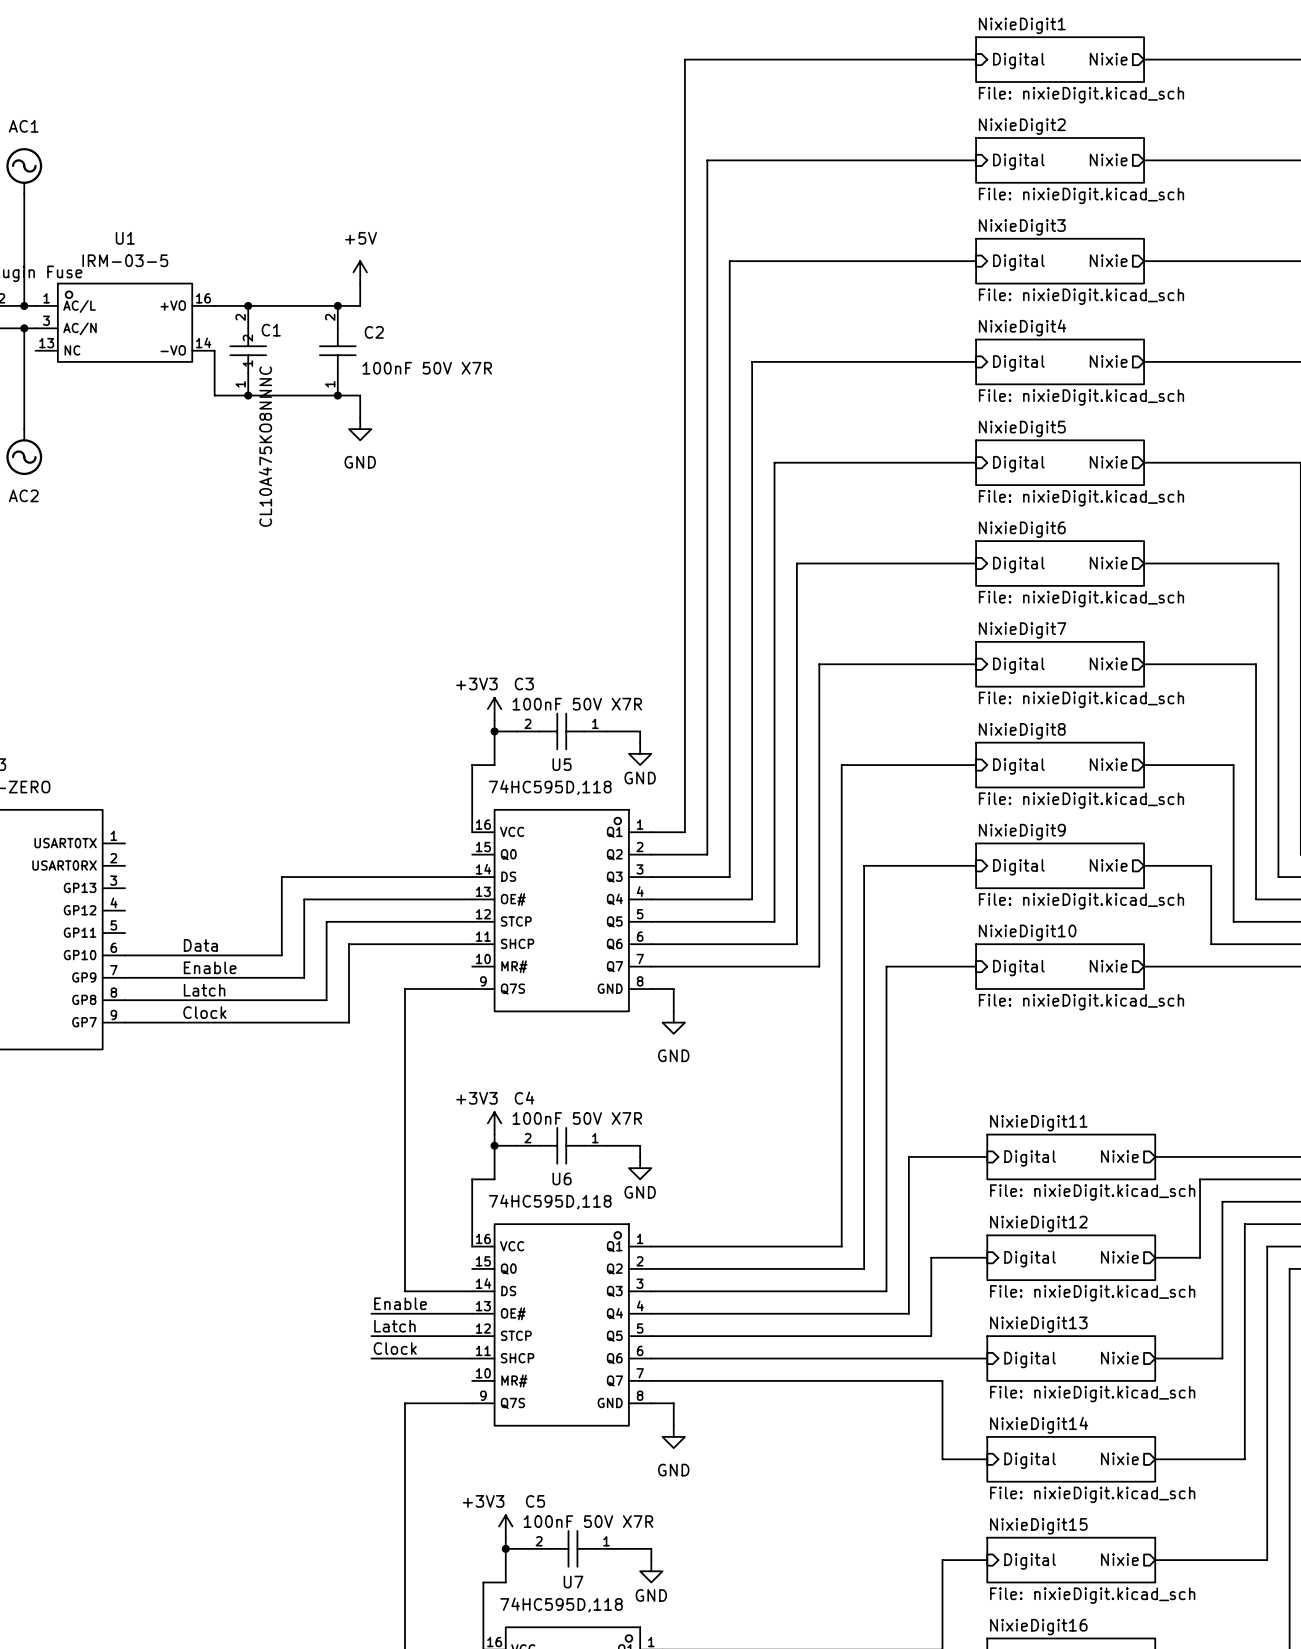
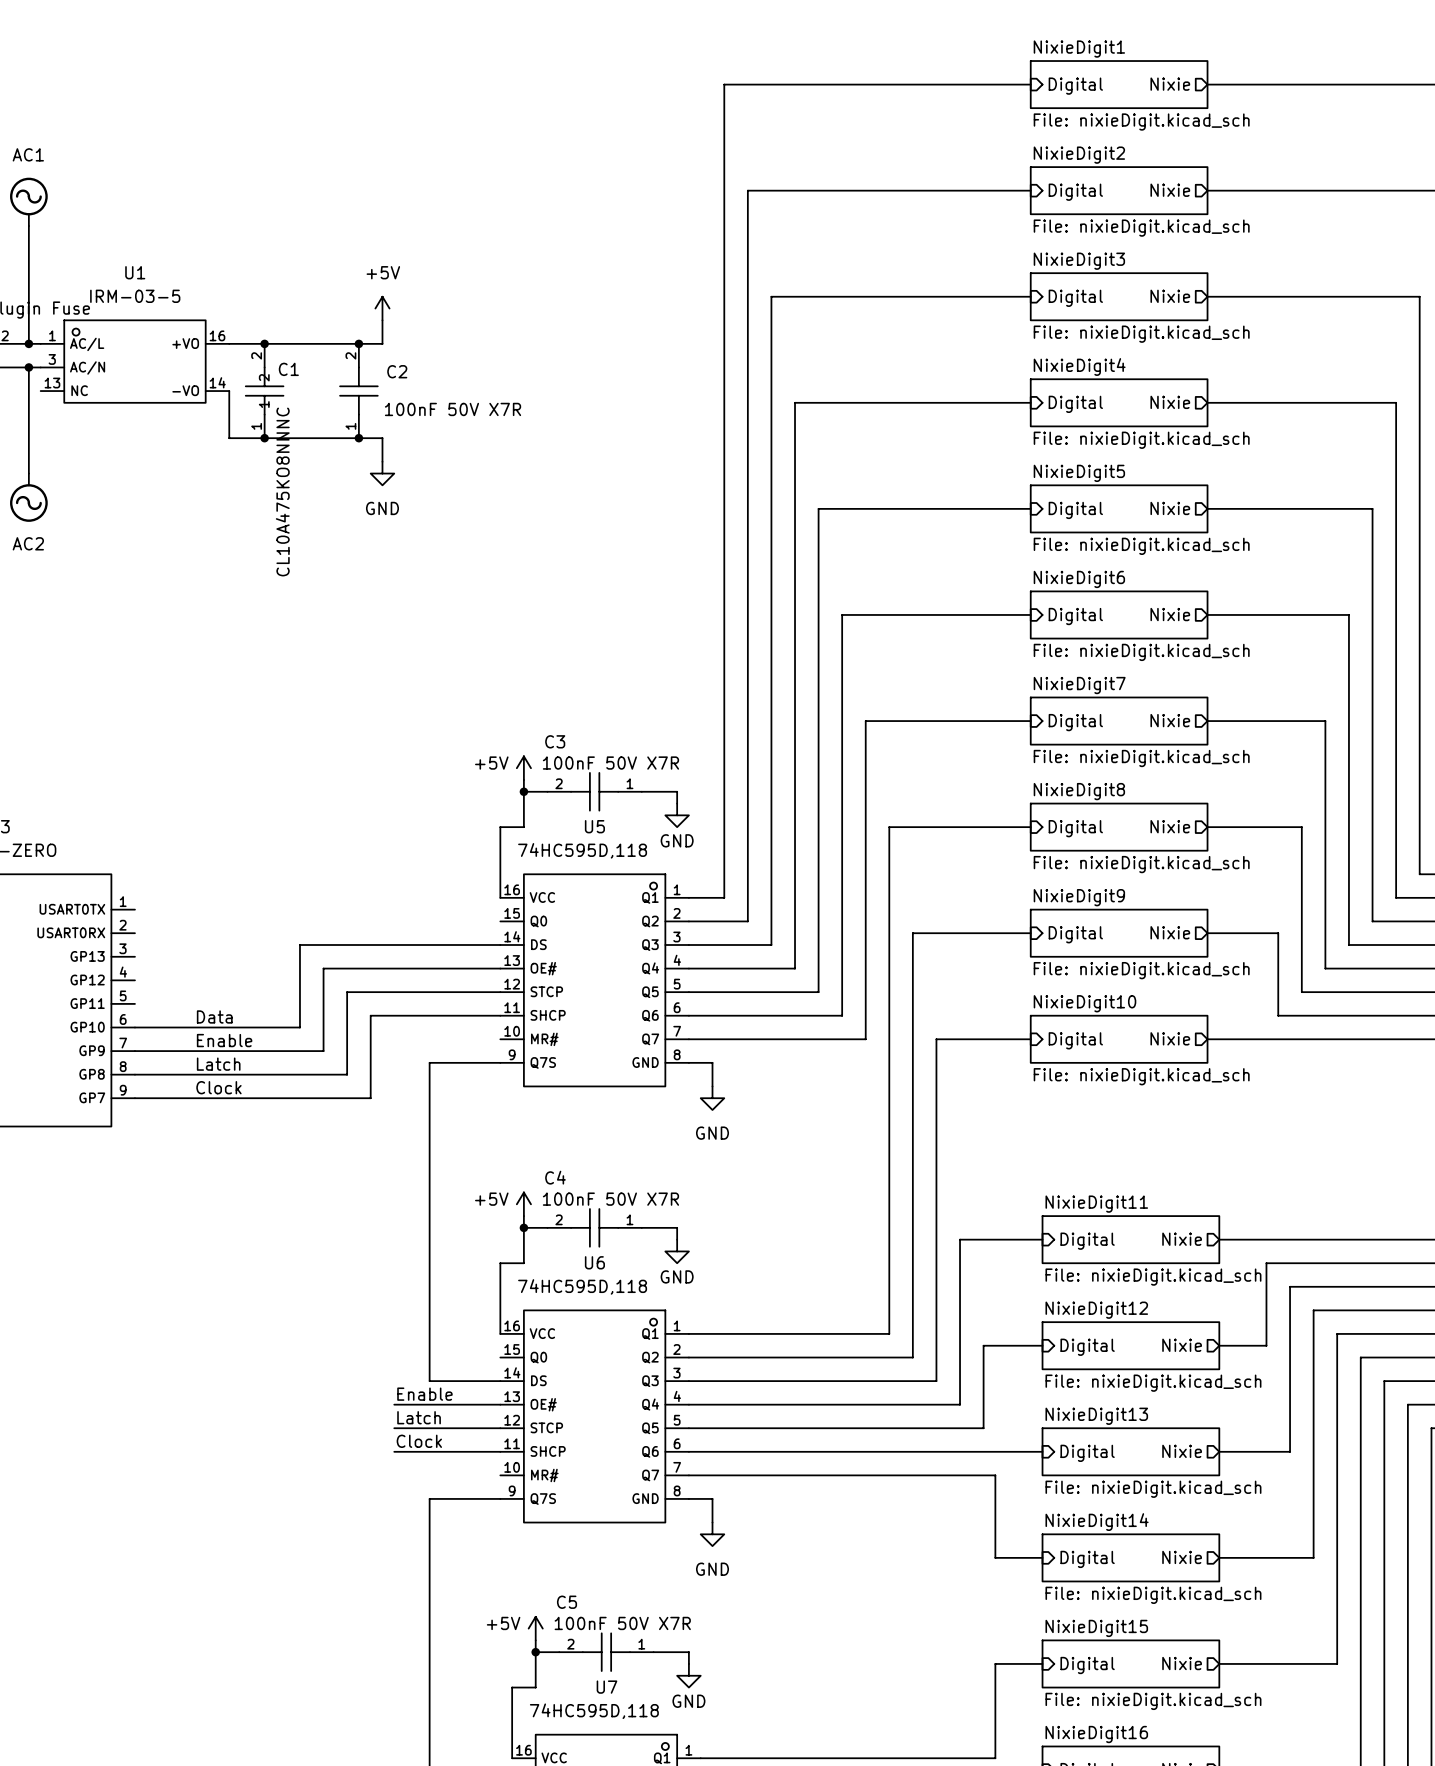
power symbol: +3V3 (494, 709) -> +5V (523, 768)
power symbol: +3V3 (494, 1123) -> +5V (523, 1204)
power symbol: +3V3 (505, 1526) -> +5V (535, 1628)

